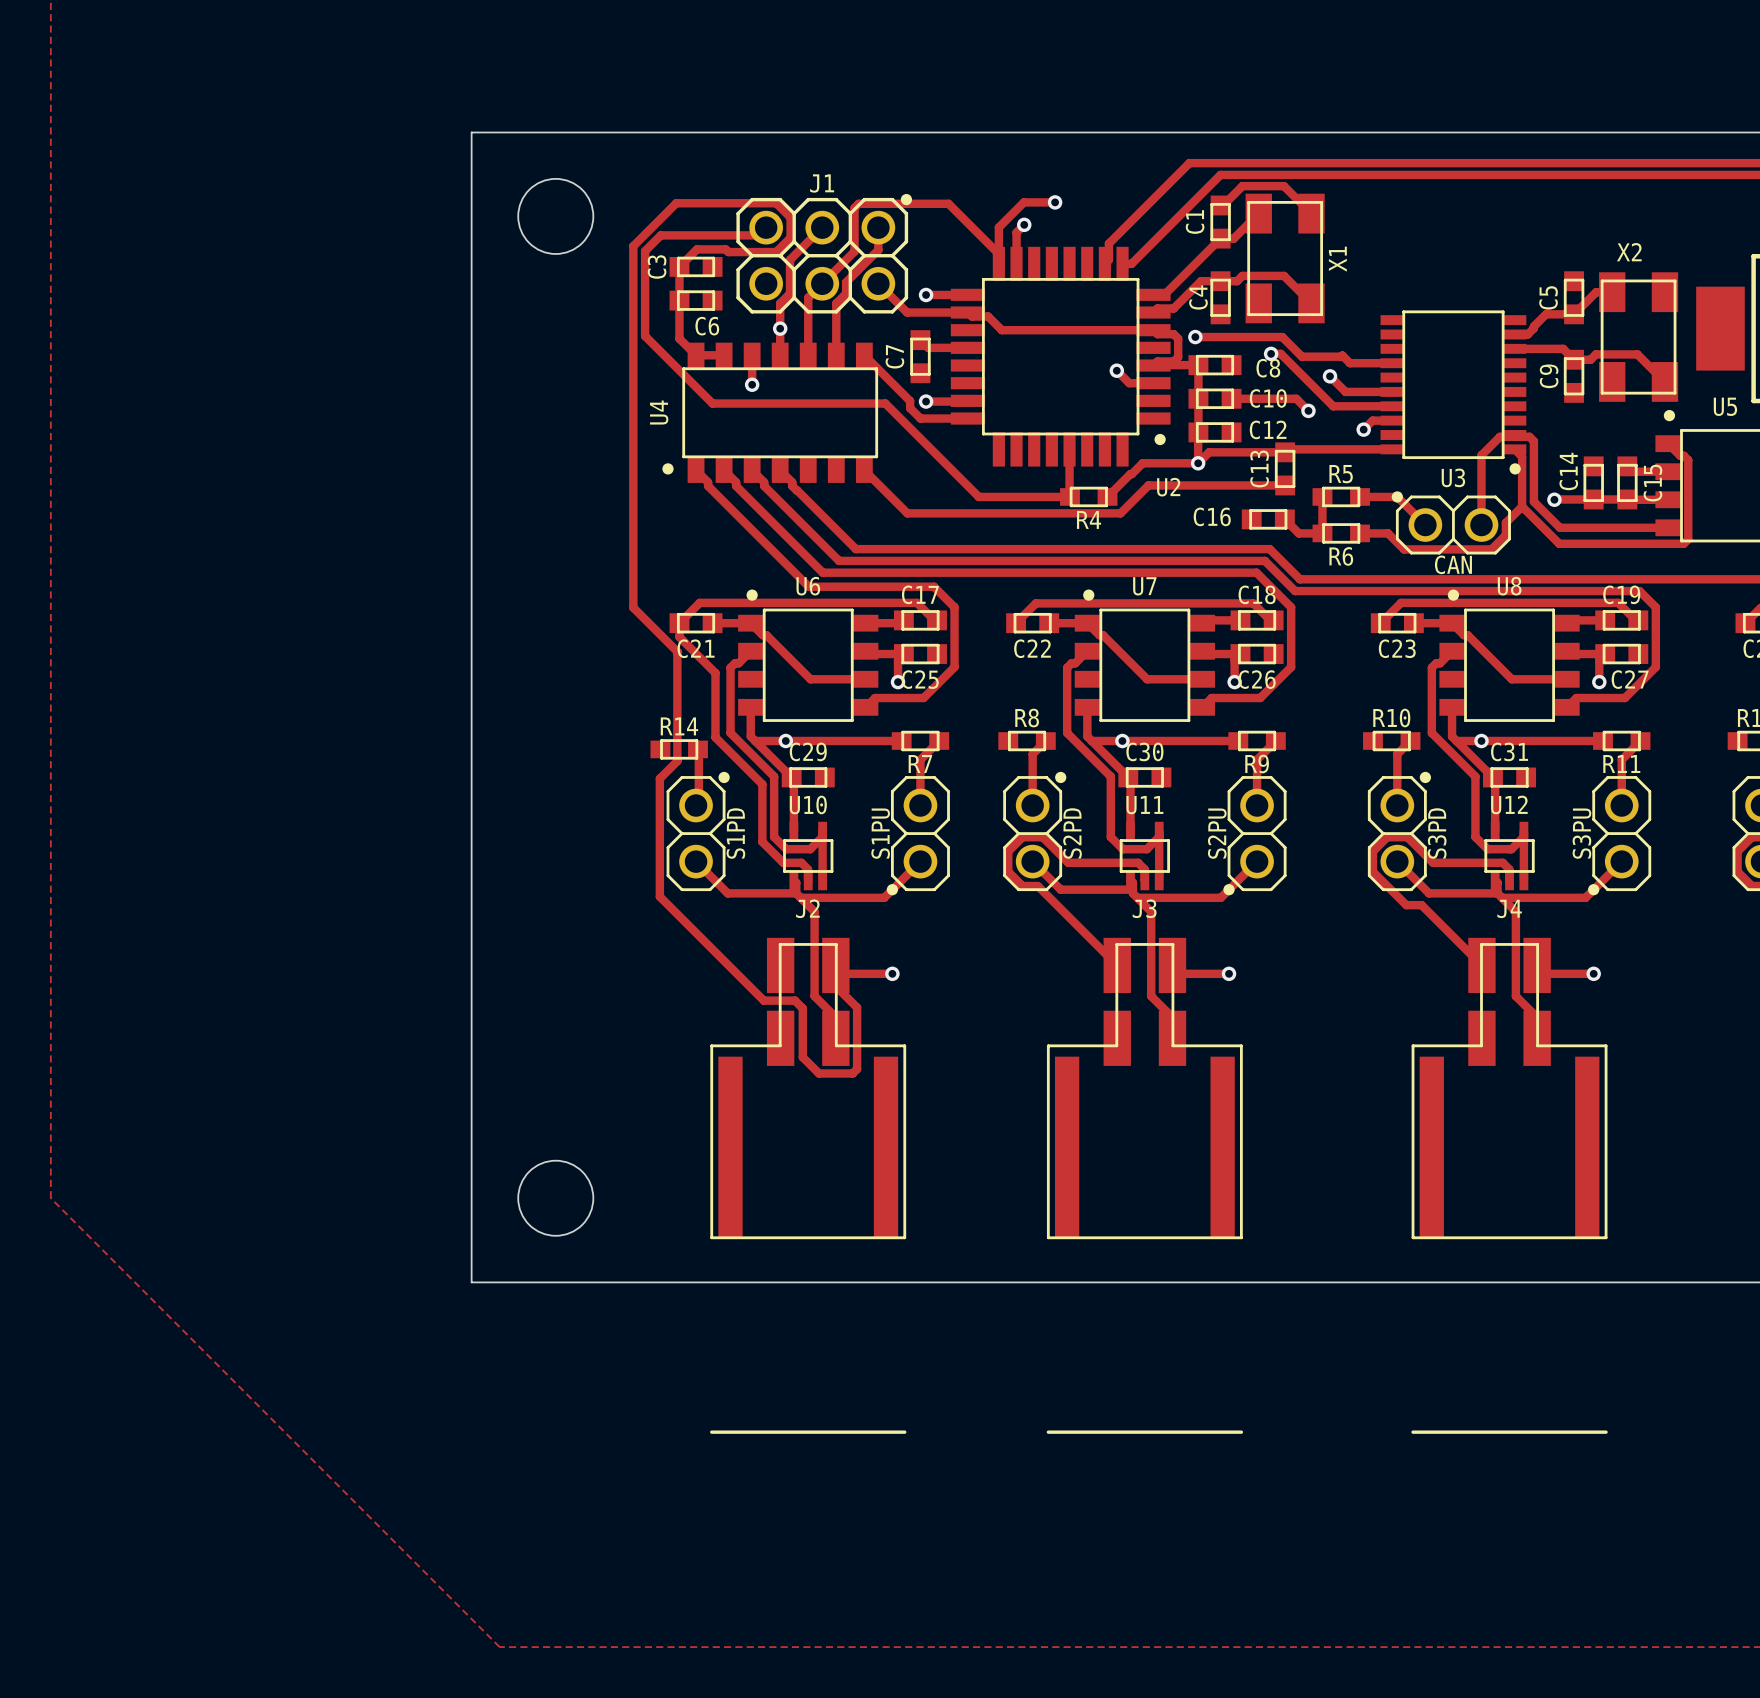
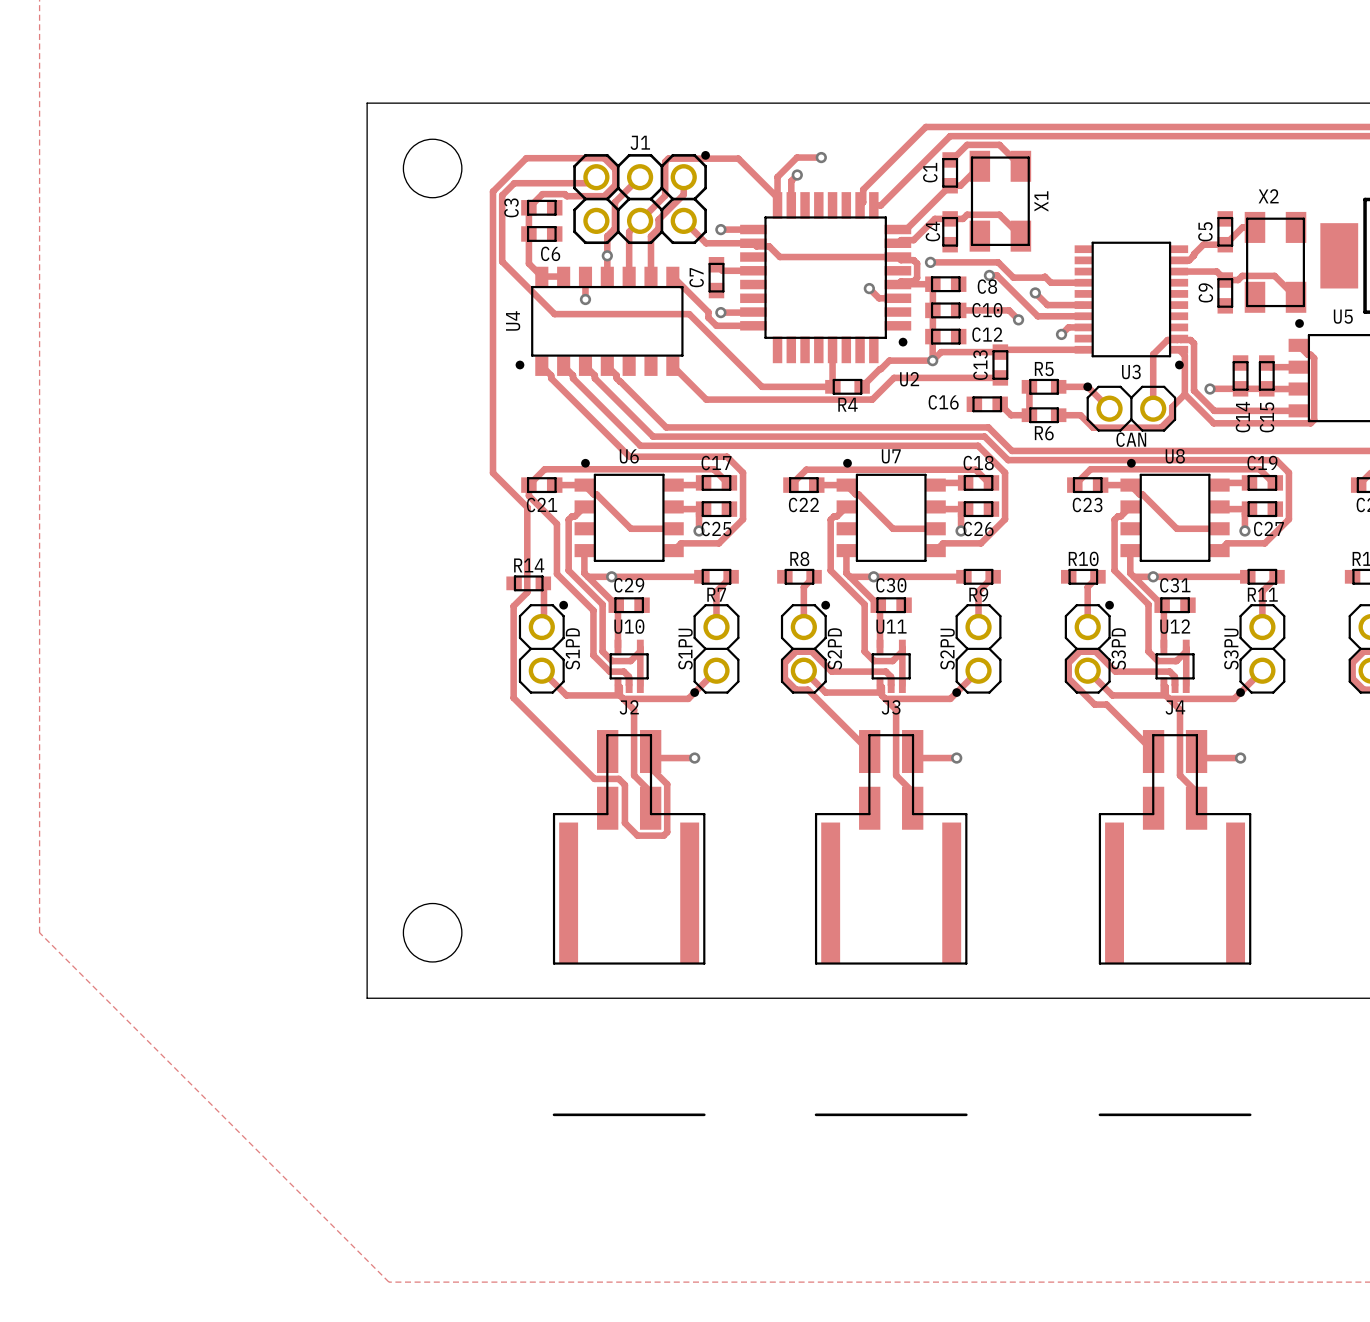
C14 name position: C14 (1568, 471) -> C14 (1242, 417)
C15 name position: C15 (1652, 483) -> C15 (1267, 417)

